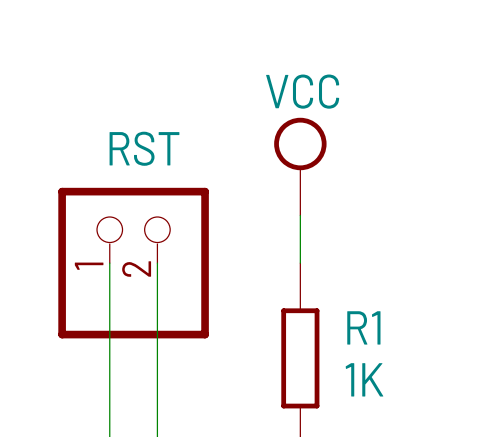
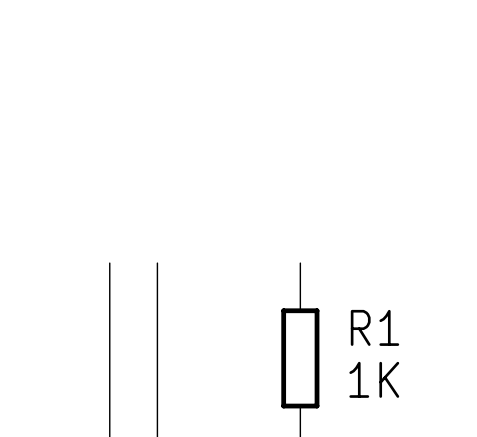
power symbol: VCC (300, 166) -> none
wire: (300, 215) (300, 263) -> none
RST: (133, 263) -> none

